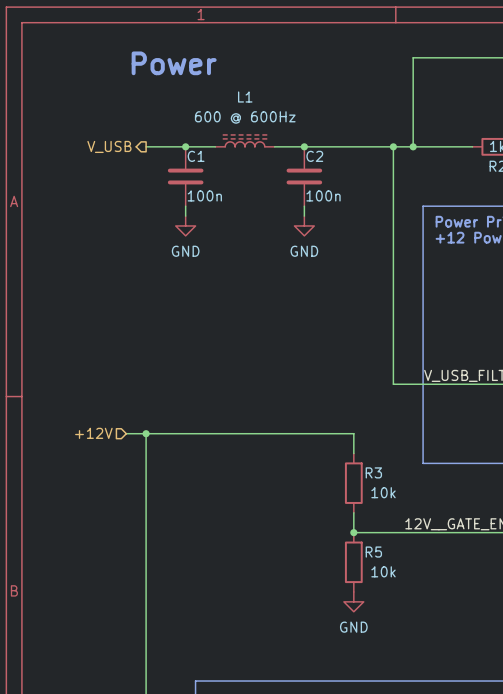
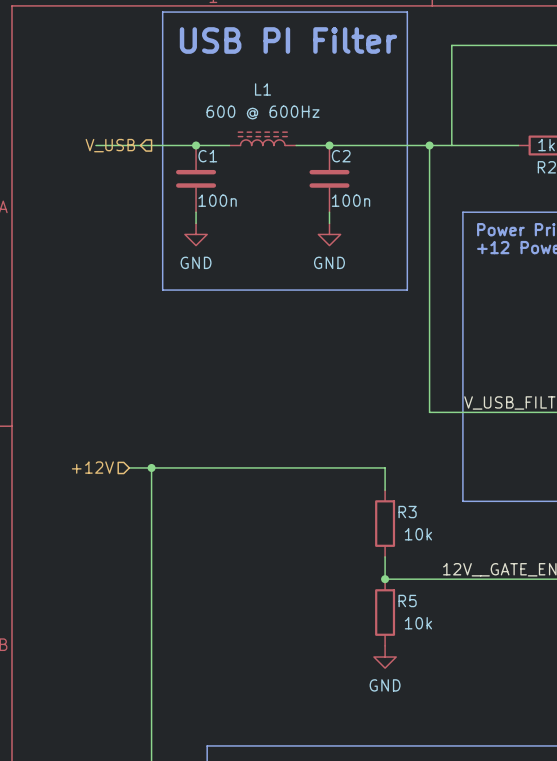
line: none -> (162, 12) (407, 12) (407, 290) (162, 290) (162, 12)
text: none -> USB PI Filter (288, 40)
text: Power (174, 63) -> none
wire: none -> (95, 145) (151, 145)
junction: (413, 146) -> none

